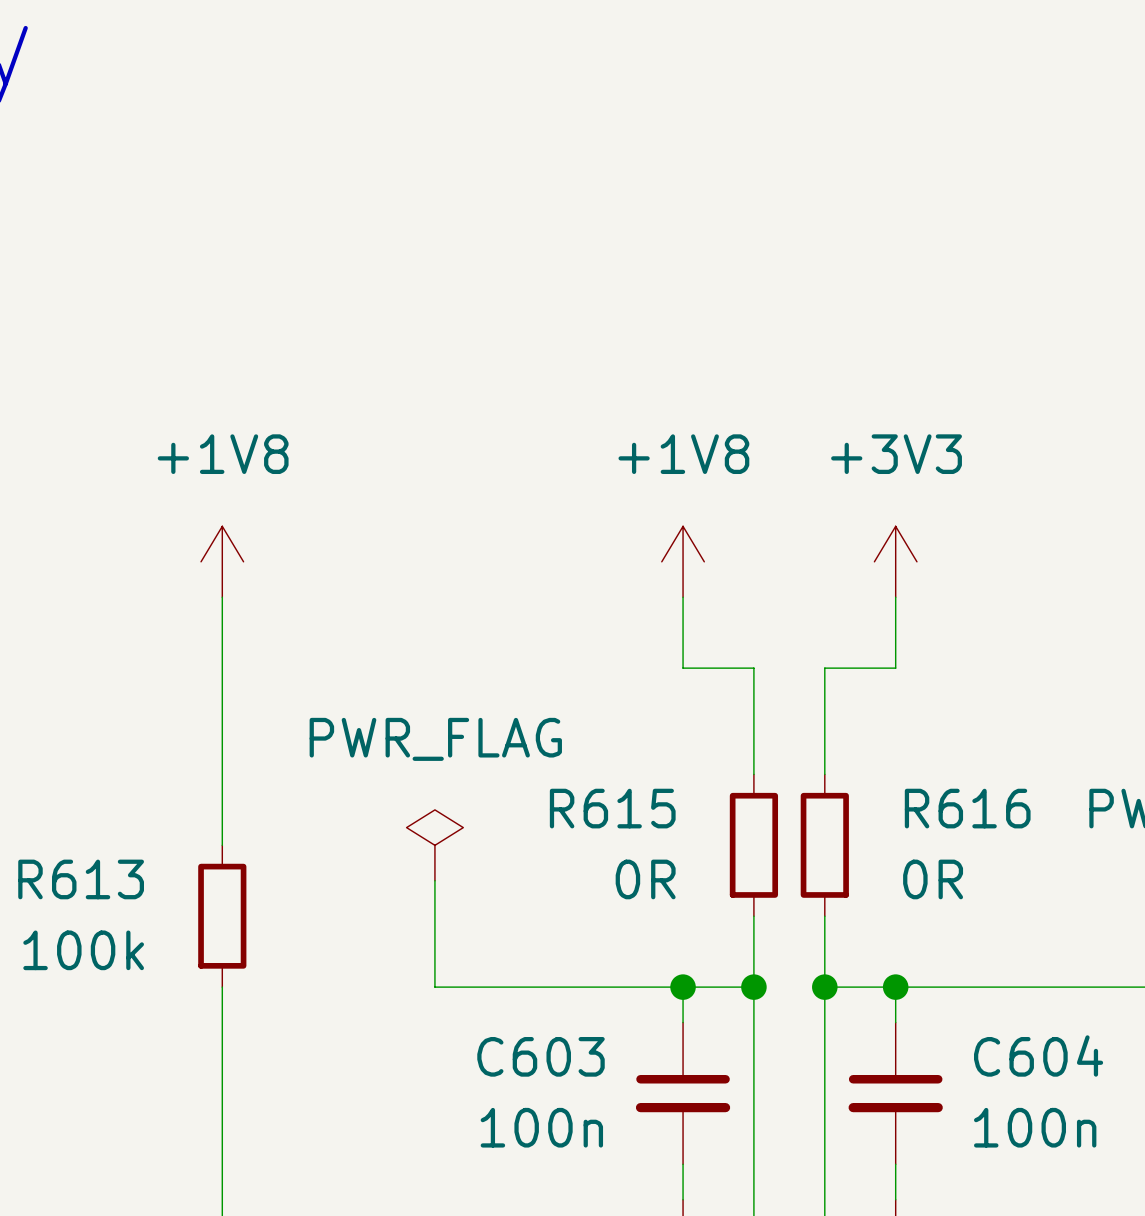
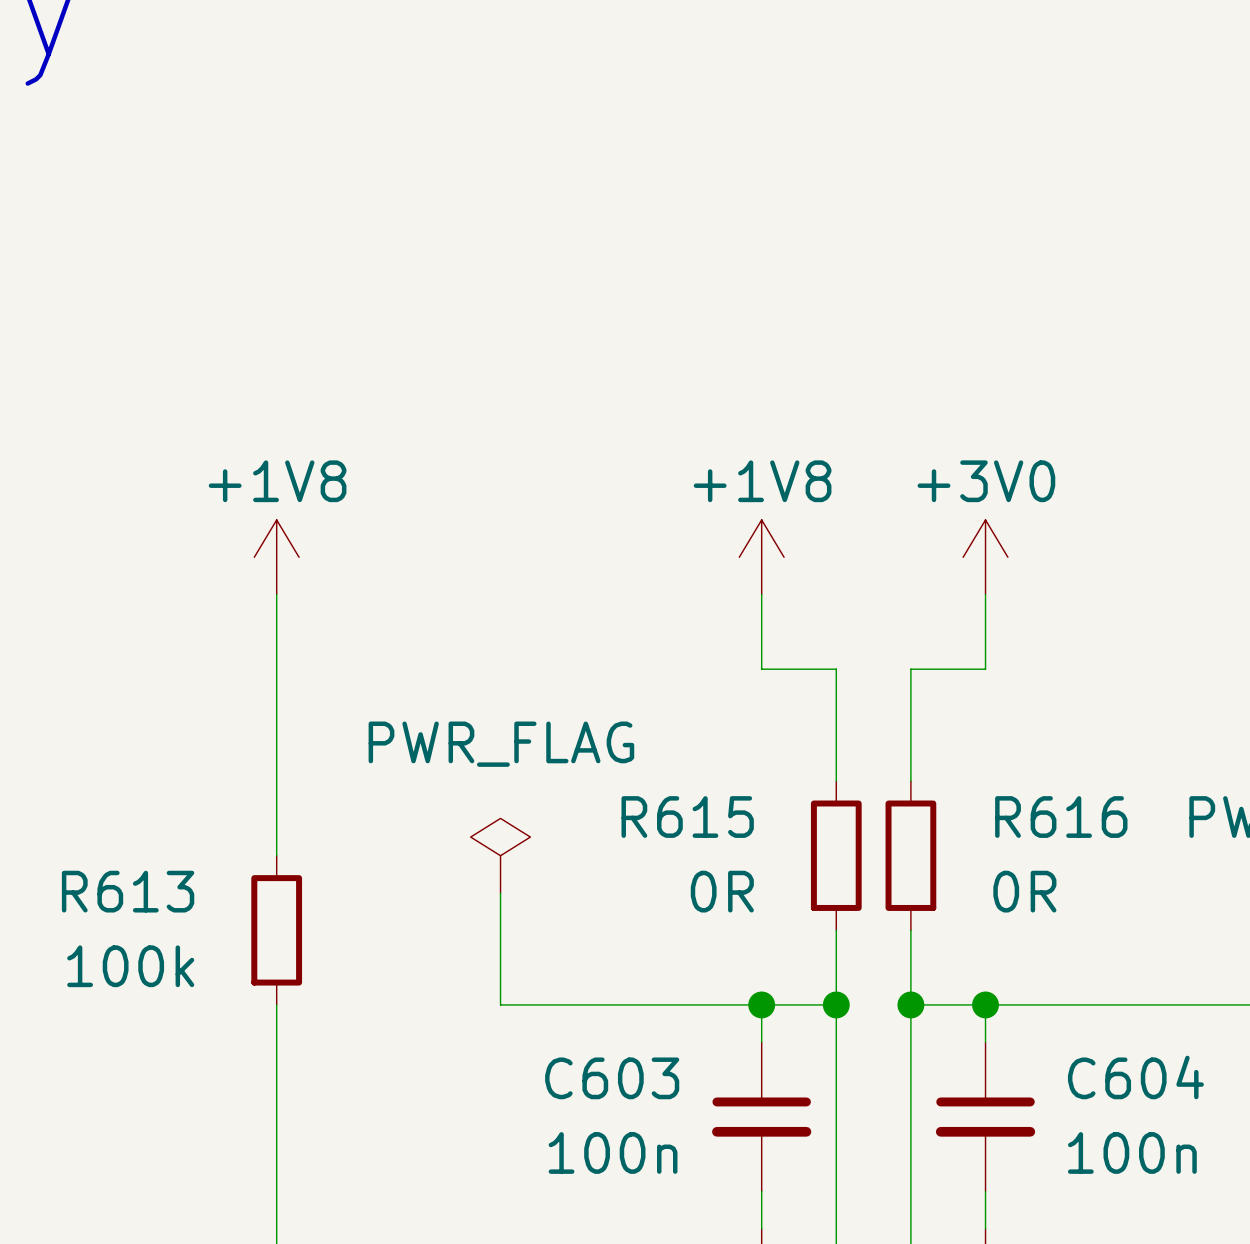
power symbol text position: +1V8 (223, 454) -> +1V8 (277, 481)
power symbol text position: +1V8 (683, 454) -> +1V8 (762, 481)
power symbol: +3V3 (895, 561) -> +3V0 (985, 557)

